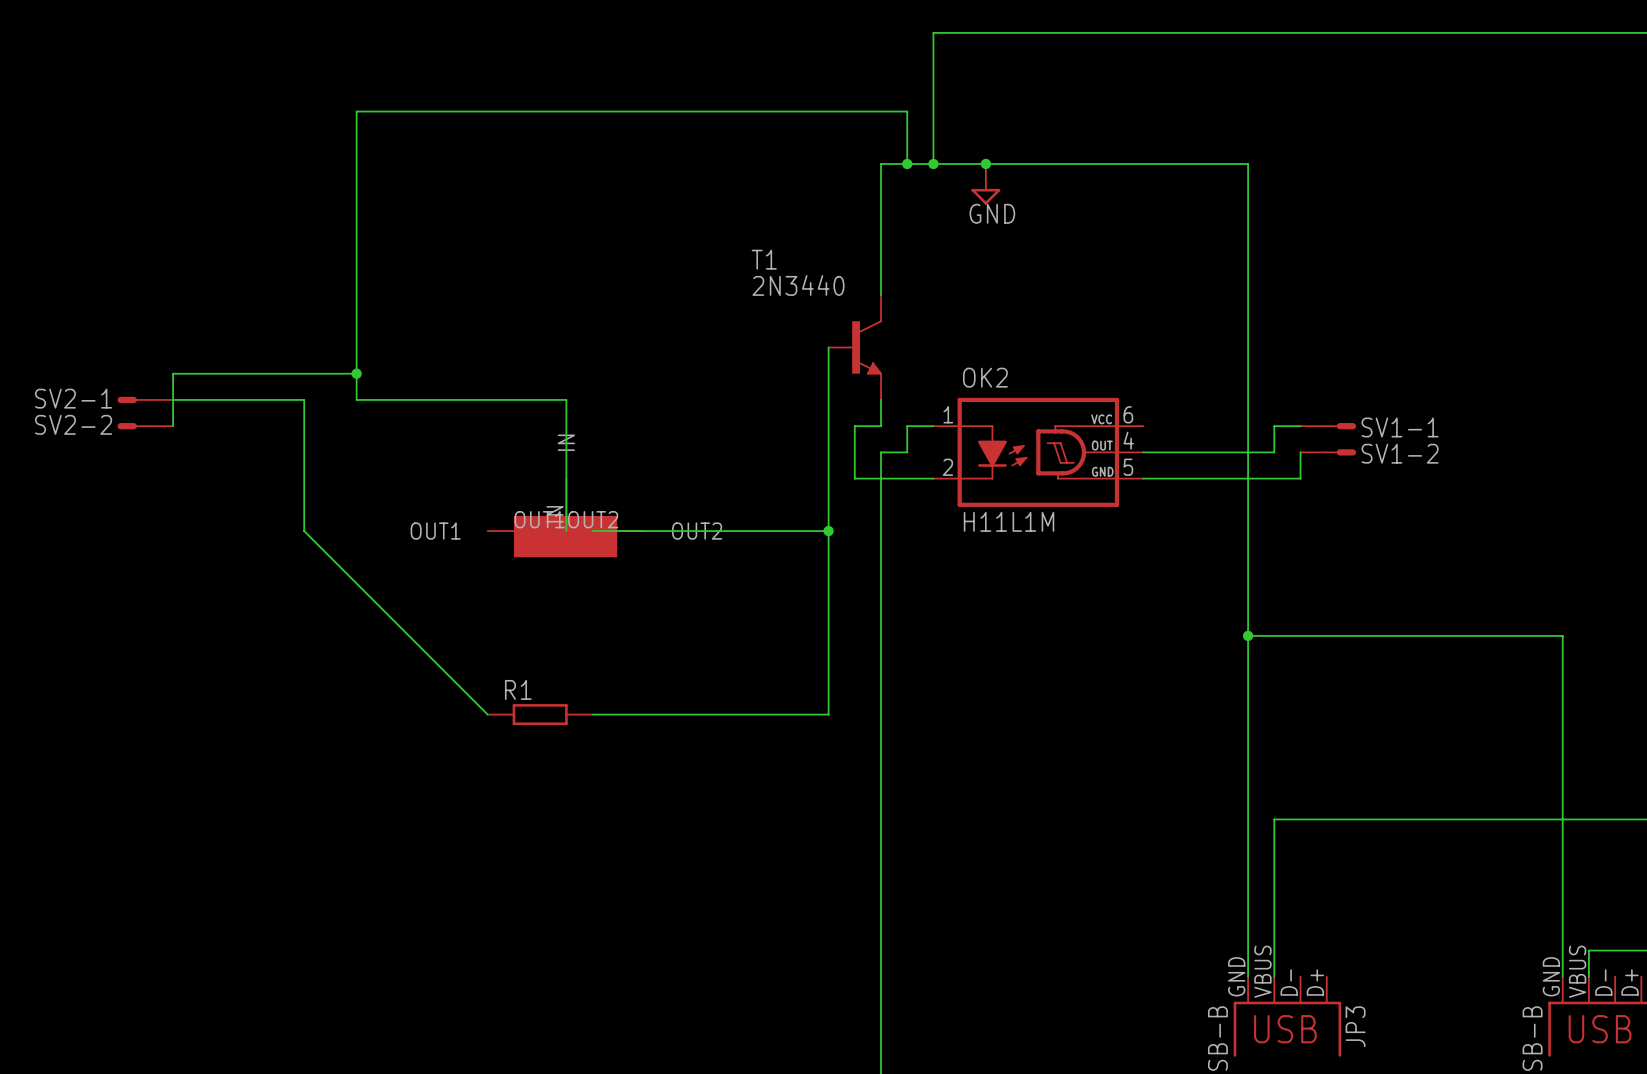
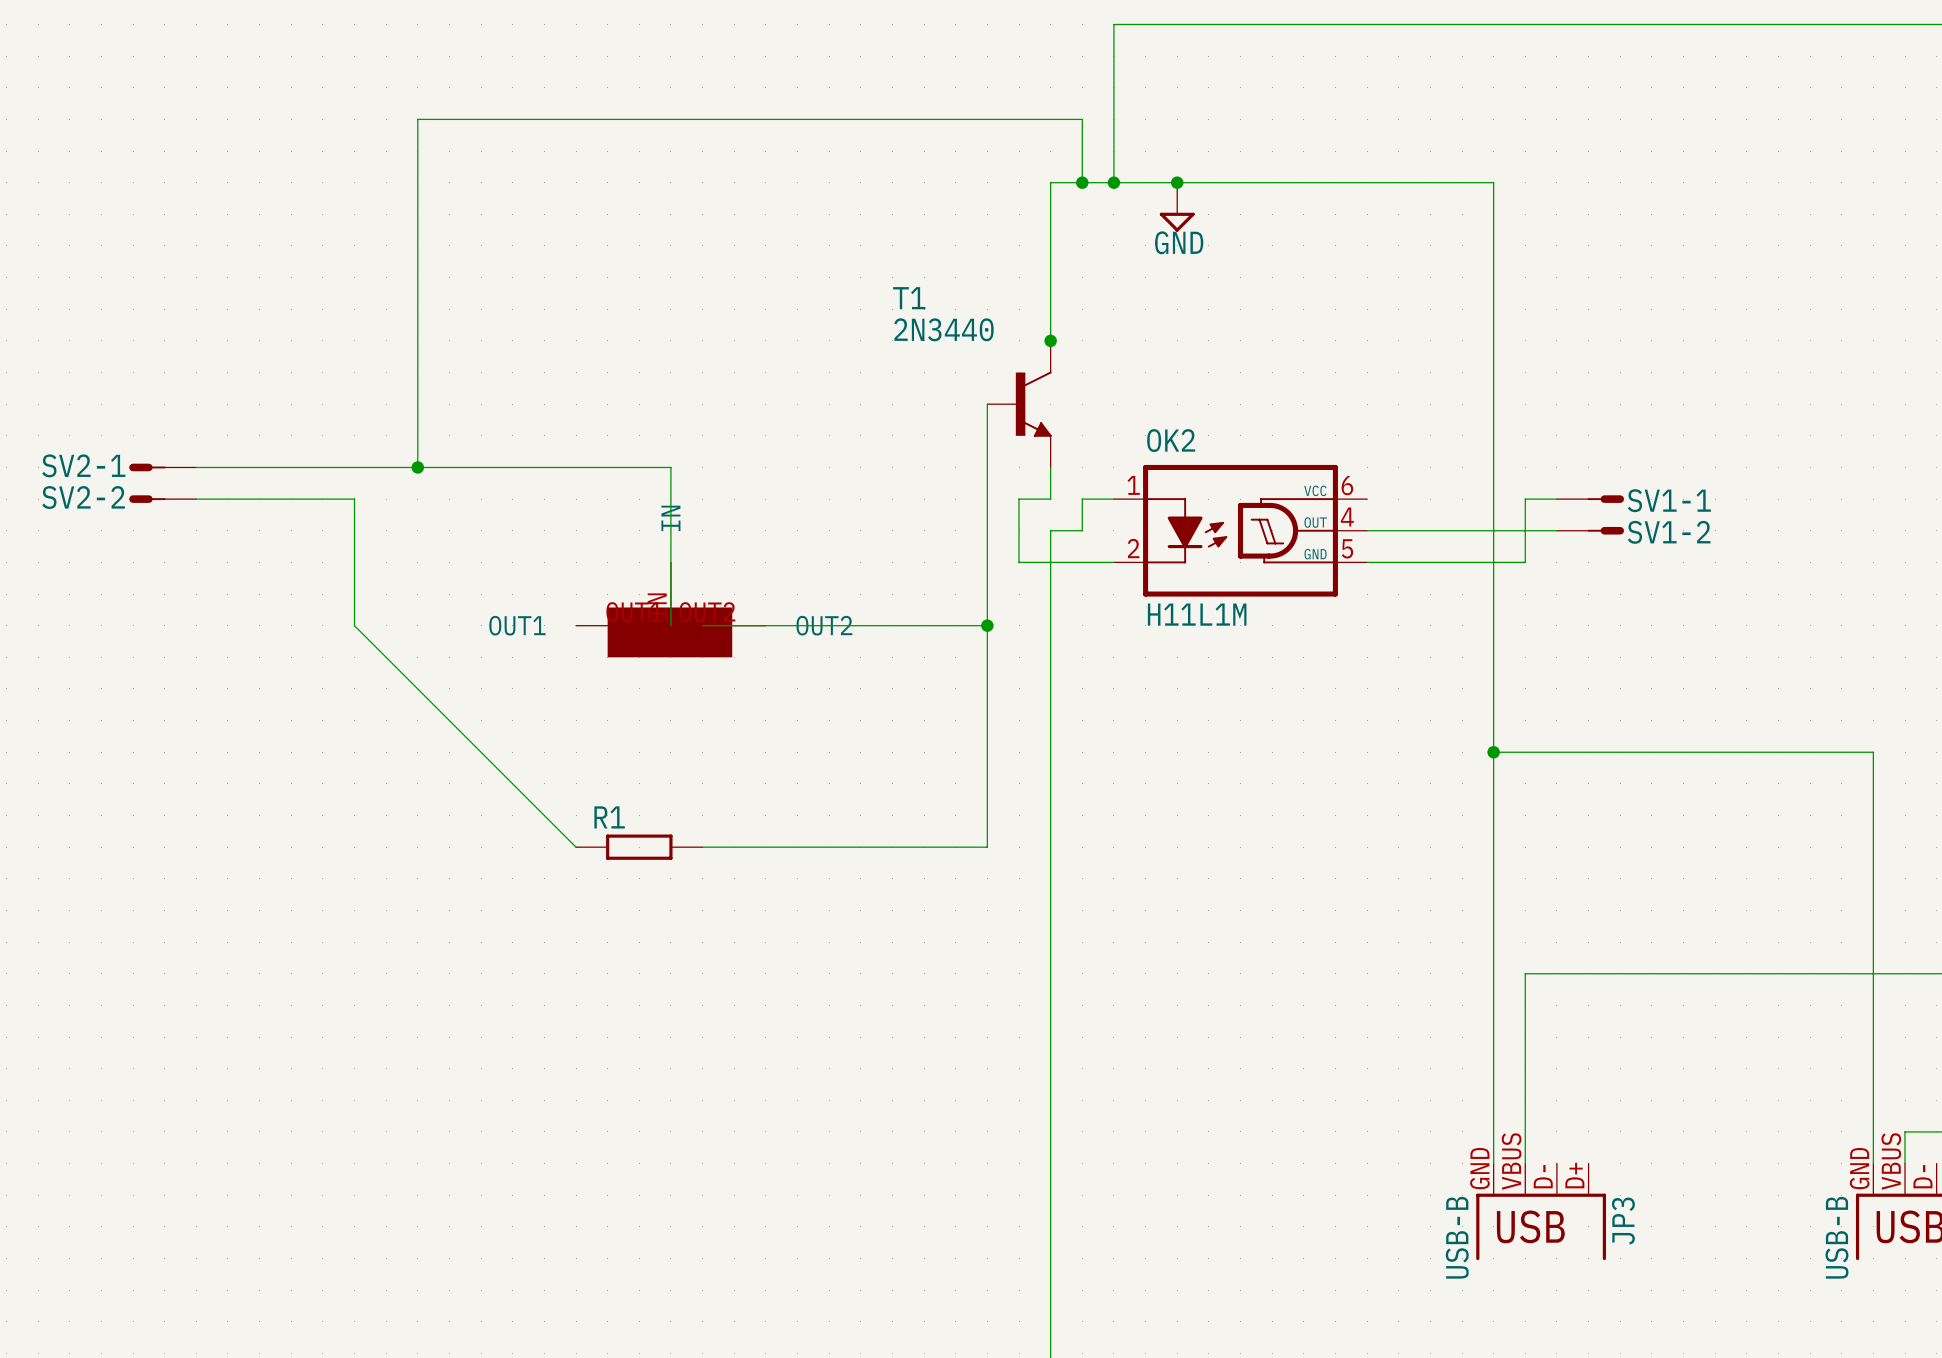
junction: none -> (1050, 340)
wire: (356, 373) (173, 373) (173, 426) -> (354, 499) (196, 499)
junction position: (356, 373) -> (417, 467)
wire: (304, 399) (304, 426) -> (354, 467) (417, 467)
wire: (1300, 452) (1300, 478) (1274, 478) -> (1556, 530) (1525, 530) (1525, 562)

